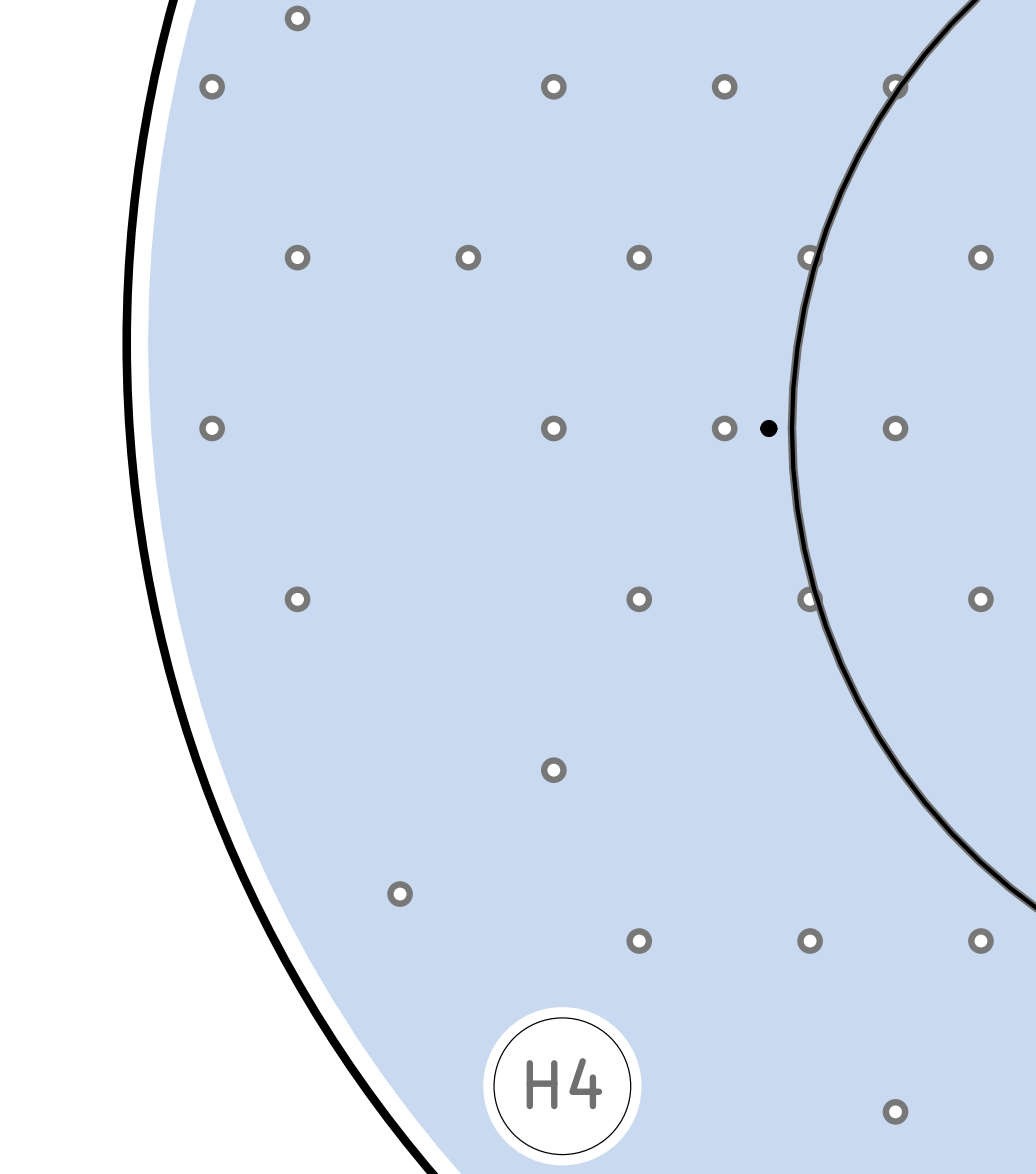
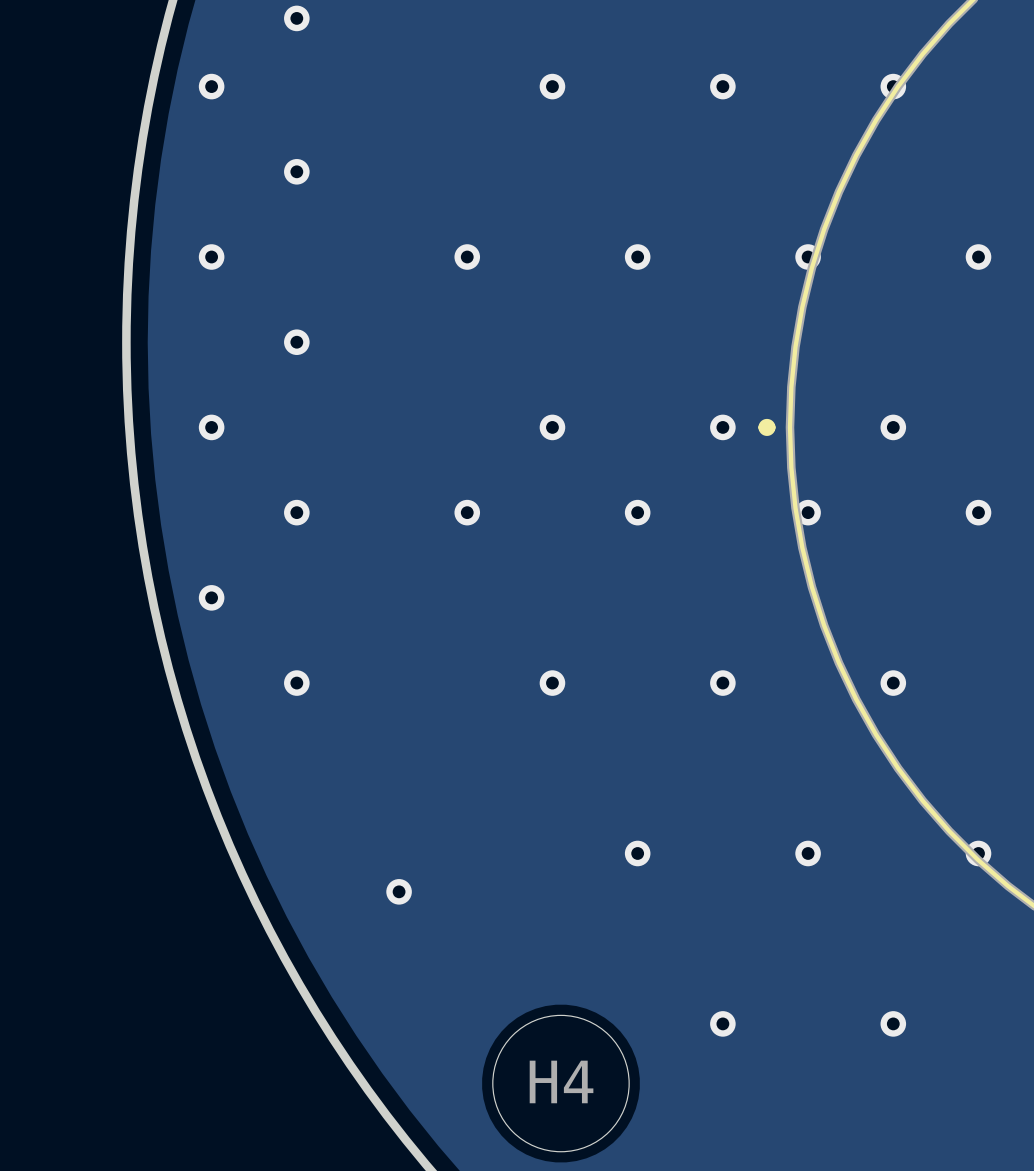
via: none -> (296, 171)
via: none -> (211, 257)
via: (297, 257) -> none
via: none -> (296, 342)
via: none -> (296, 512)
via: none -> (467, 512)
via: none -> (637, 512)
via: none -> (808, 512)
via: none -> (978, 512)
via: none -> (211, 597)
via: (297, 599) -> none
via: (639, 599) -> none
via: (810, 599) -> none
via: (980, 599) -> none
via: none -> (296, 683)
via: none -> (552, 683)
via: none -> (722, 683)
via: none -> (893, 683)
via: (553, 770) -> none
via: none -> (637, 853)
via: none -> (808, 853)
via: none -> (978, 853)
via: (639, 941) -> none
via: (810, 941) -> none
via: (980, 941) -> none
via: none -> (722, 1023)
via: none -> (893, 1023)
via: (895, 1111) -> none

